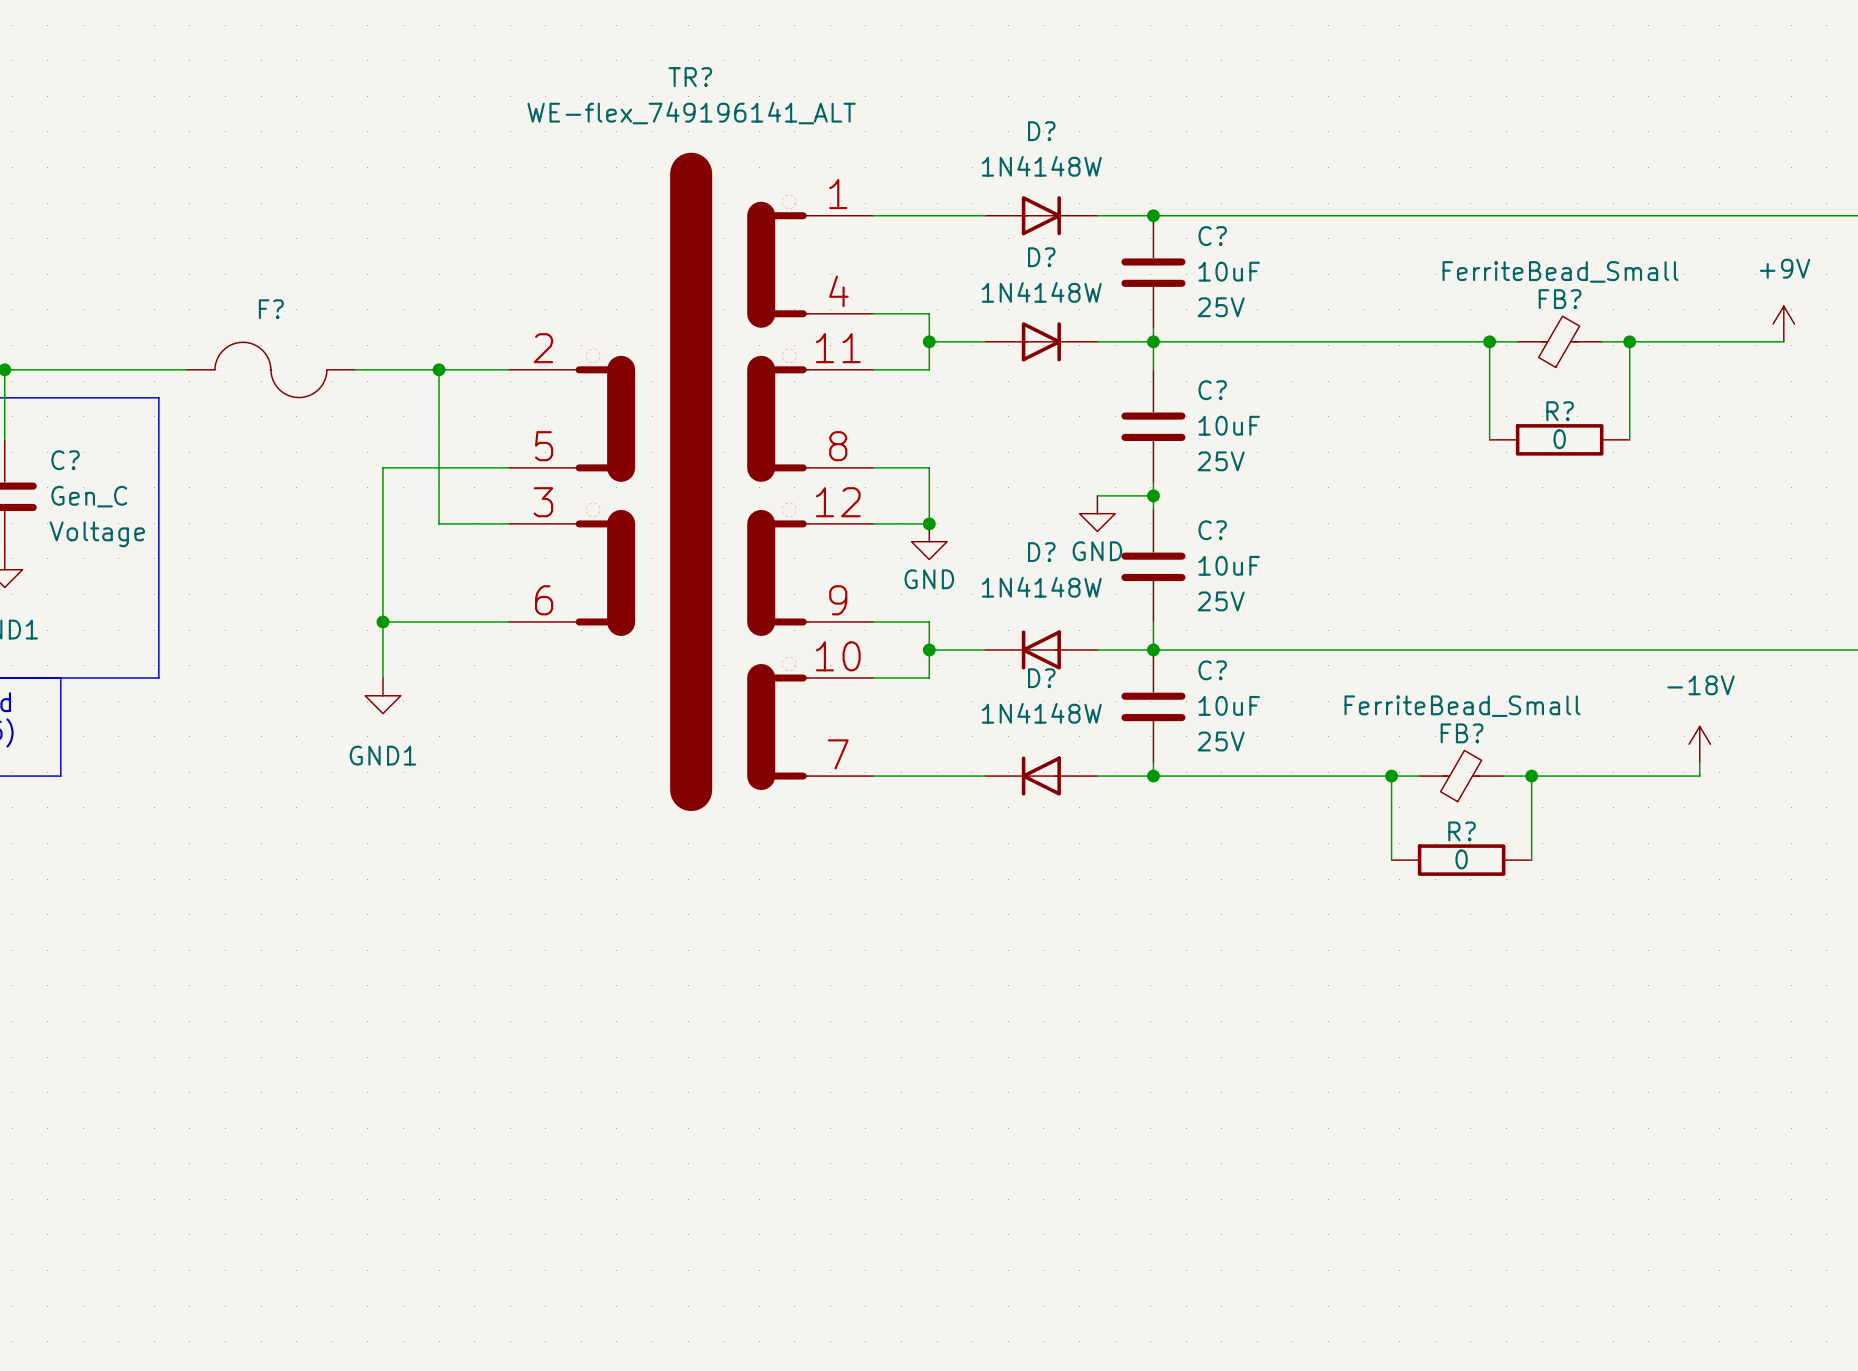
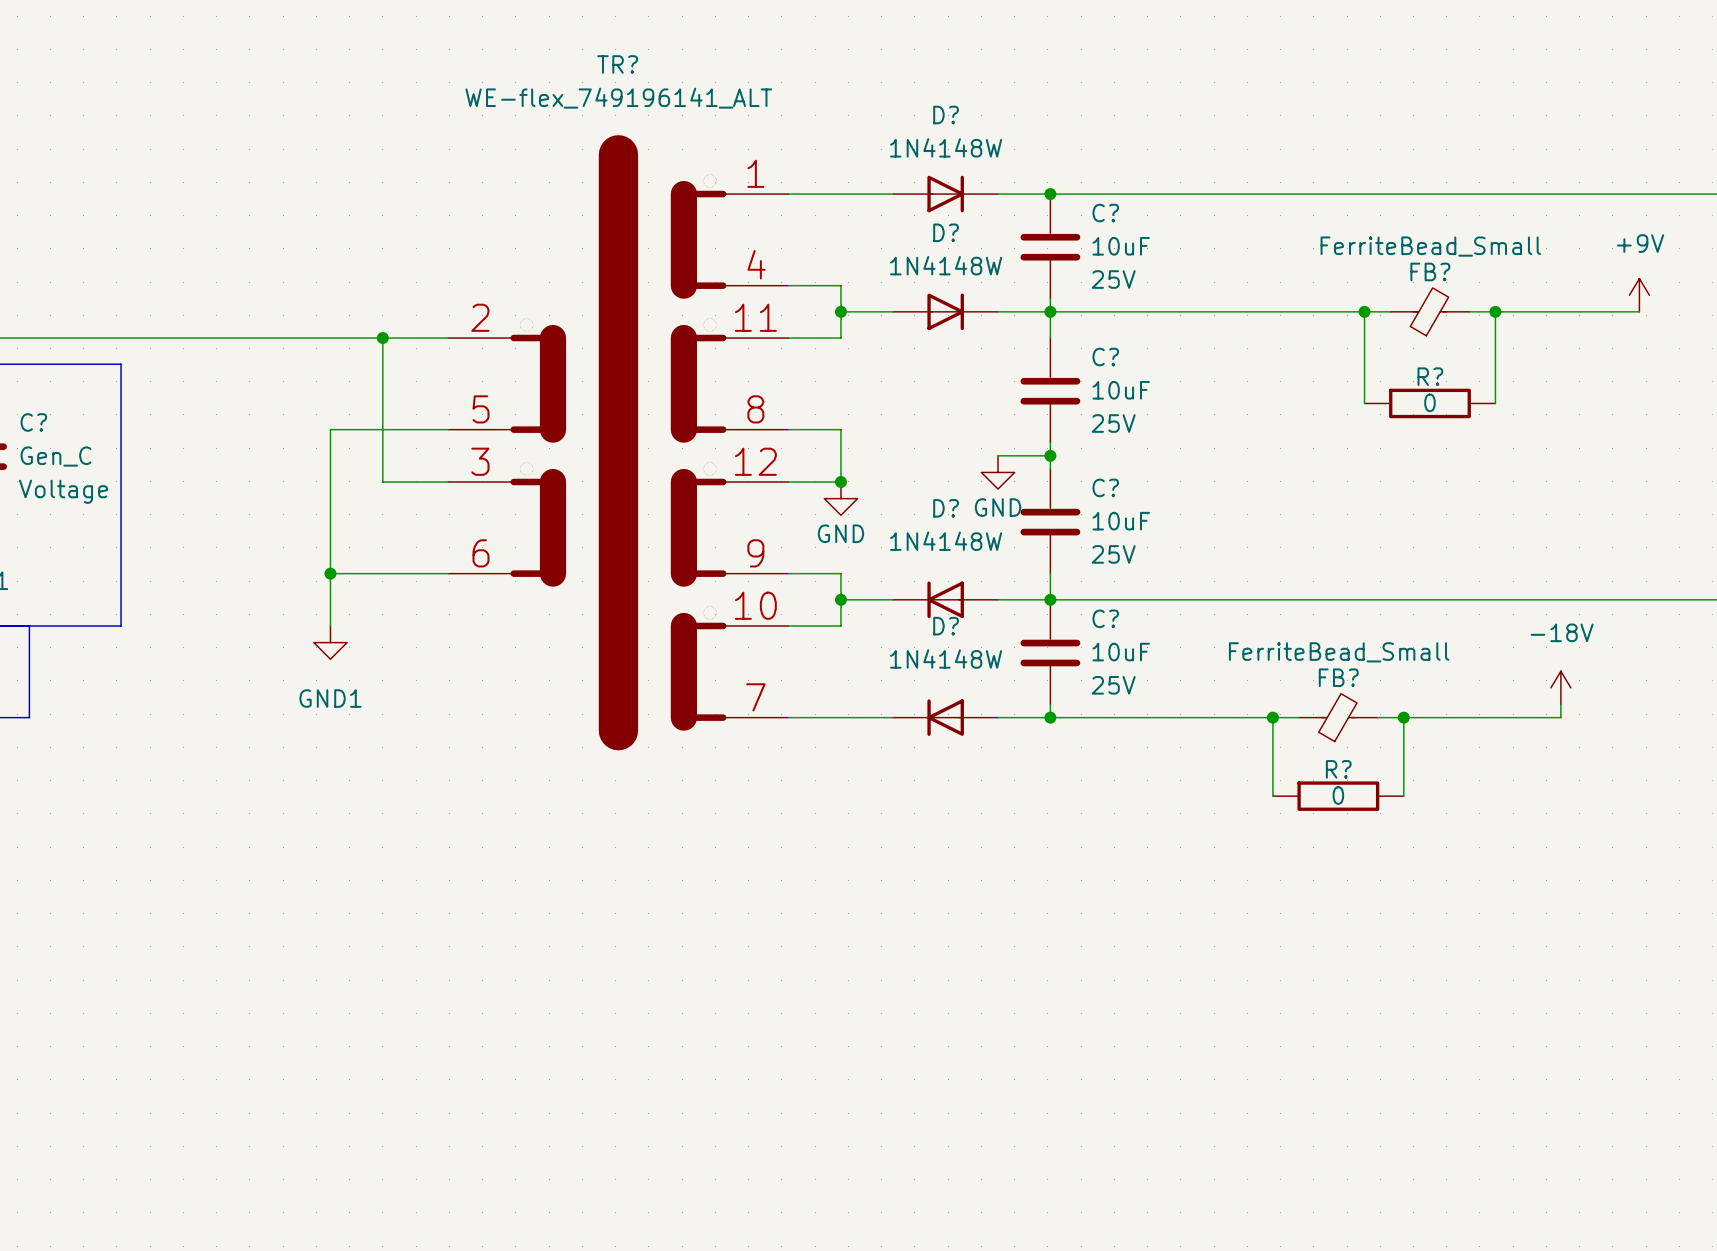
wire: none -> (147, 338) (304, 338)
F?: (270, 369) -> none

